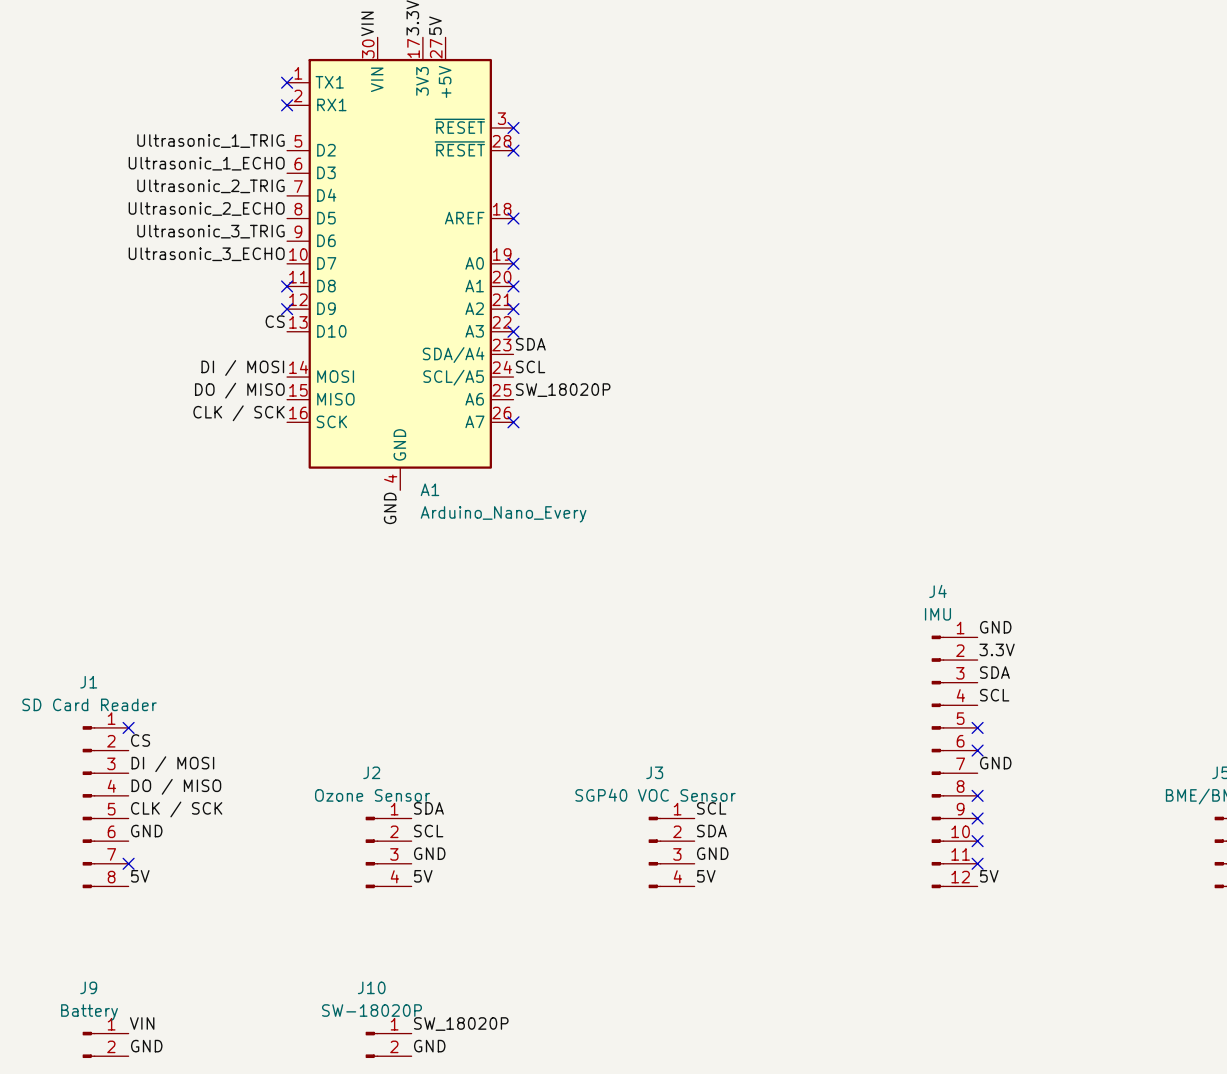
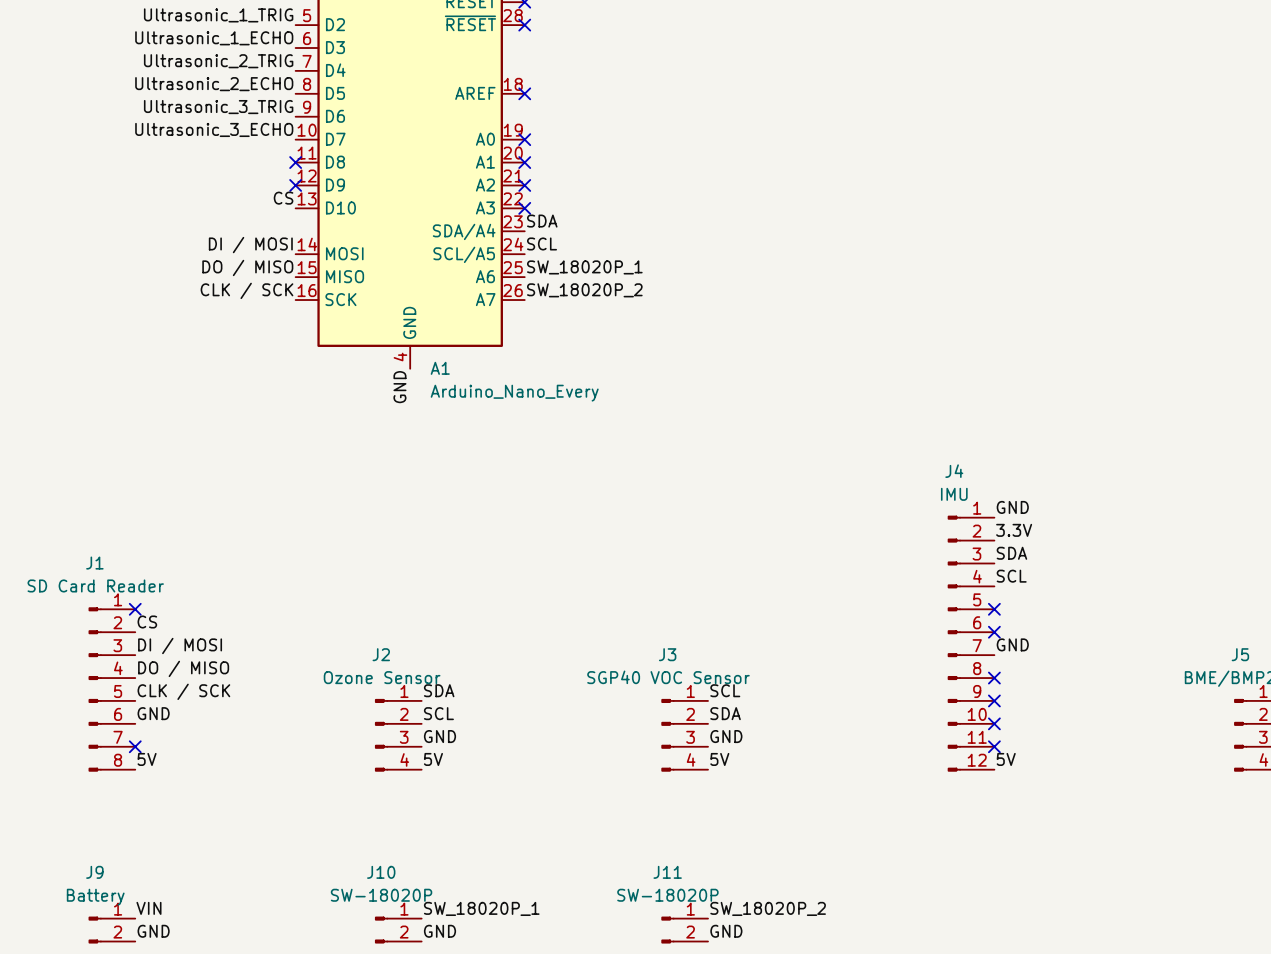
label: SW_18020P (563, 390) -> SW_18020P_1 (584, 267)
label: none -> SW_18020P_2 (584, 290)
no-connect mark: (513, 422) -> none
label: SW_18020P (461, 1024) -> SW_18020P_1 (481, 908)
label: none -> SW_18020P_2 (768, 908)
J11: none -> SW-18020P (684, 930)
label: none -> GND (726, 931)

